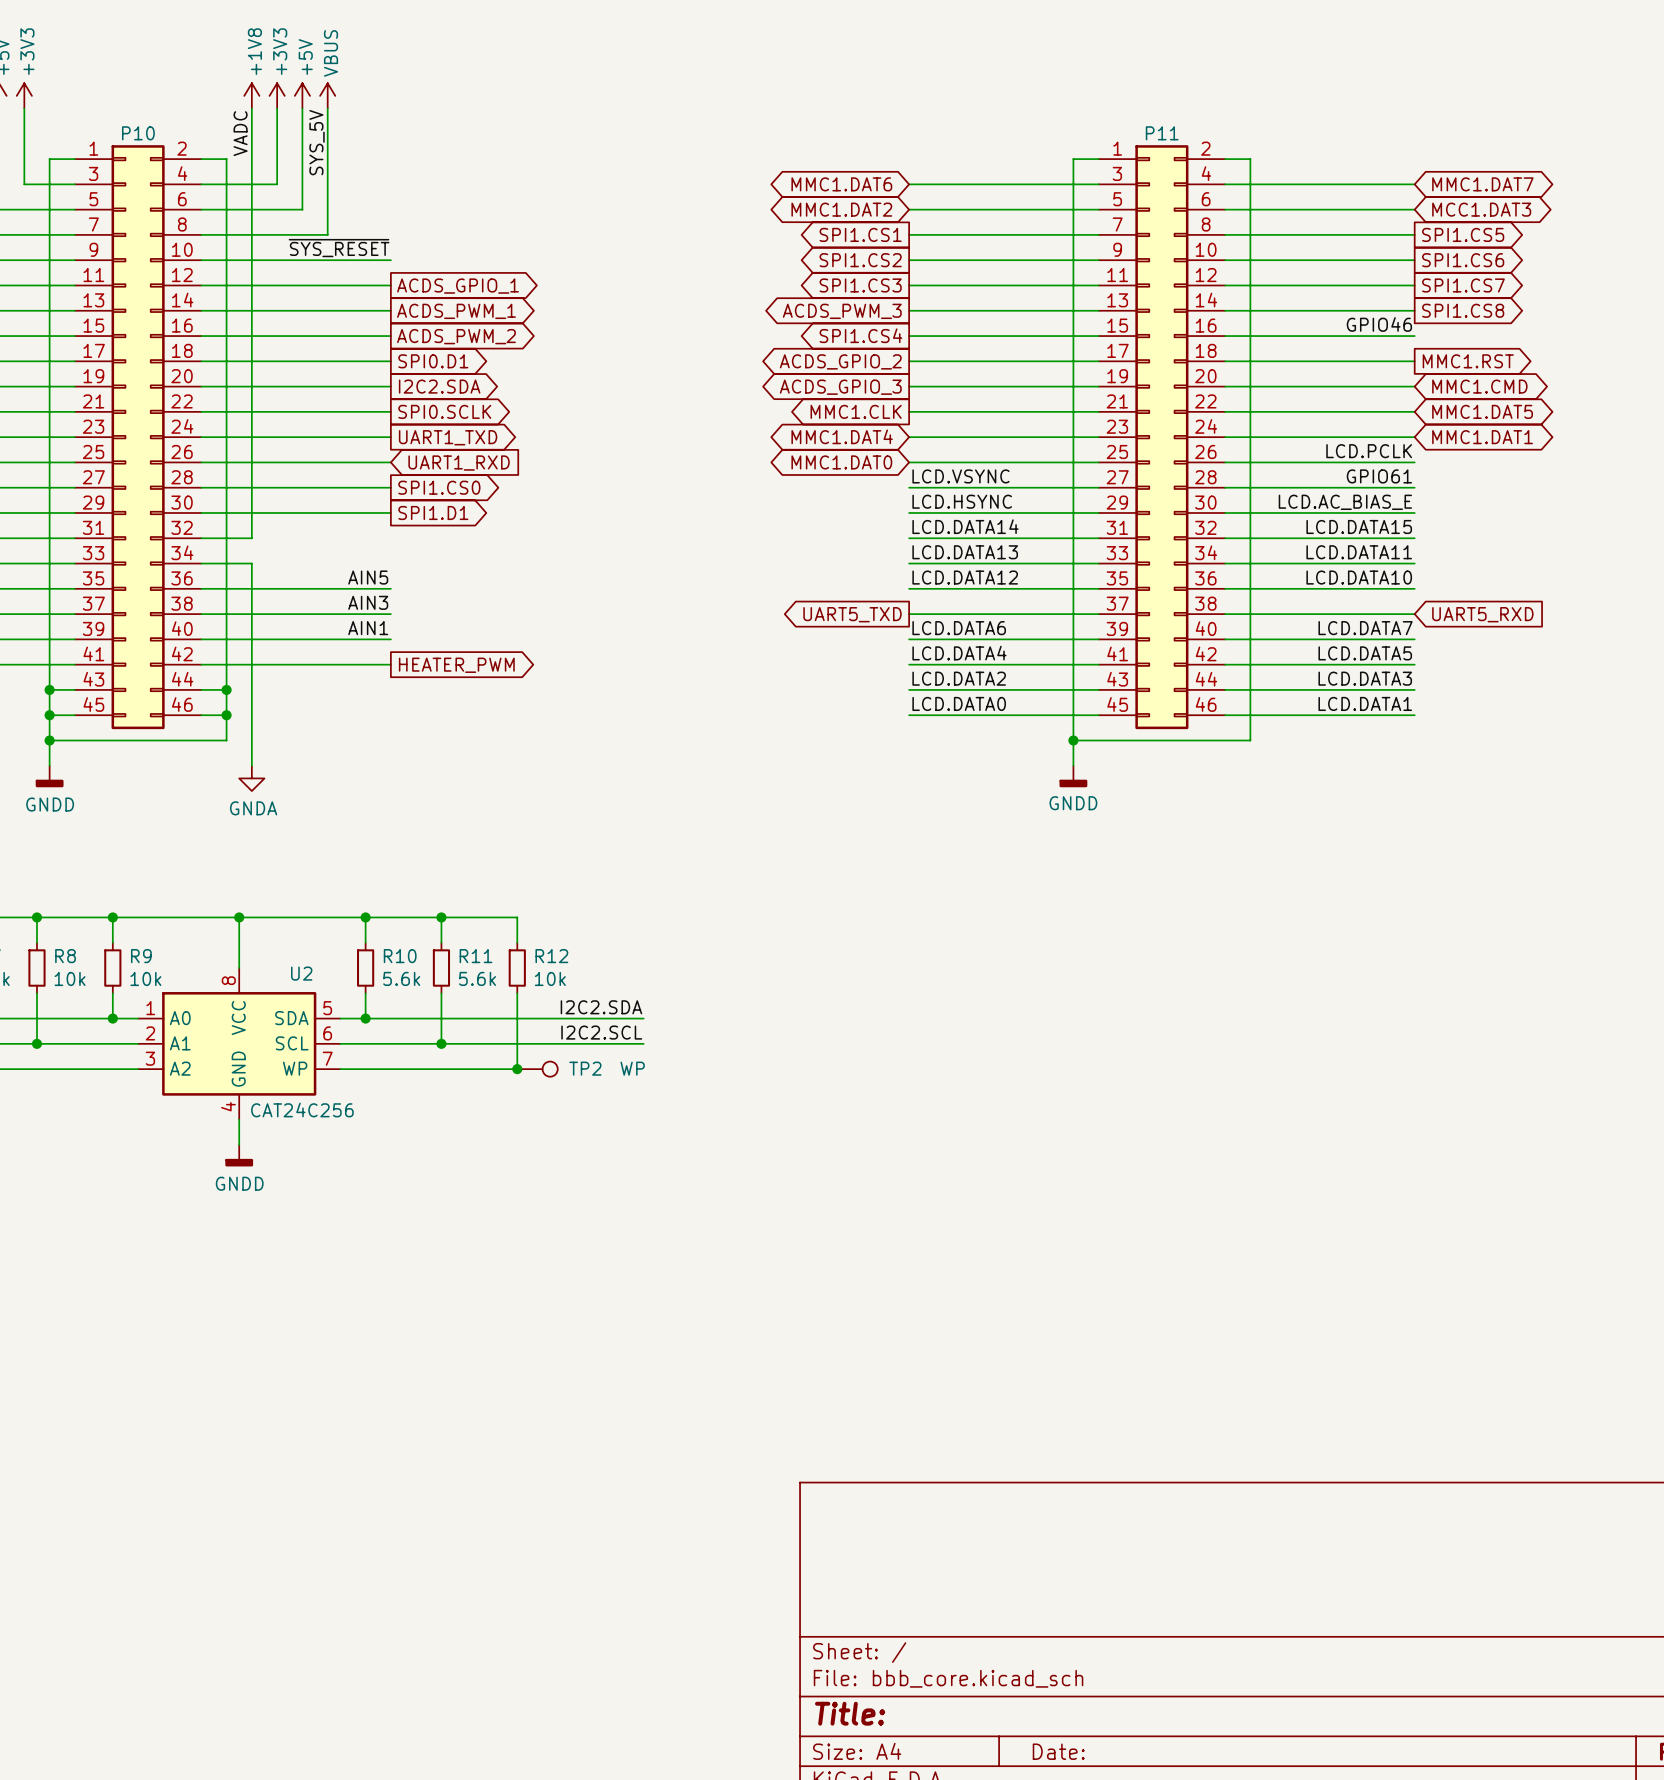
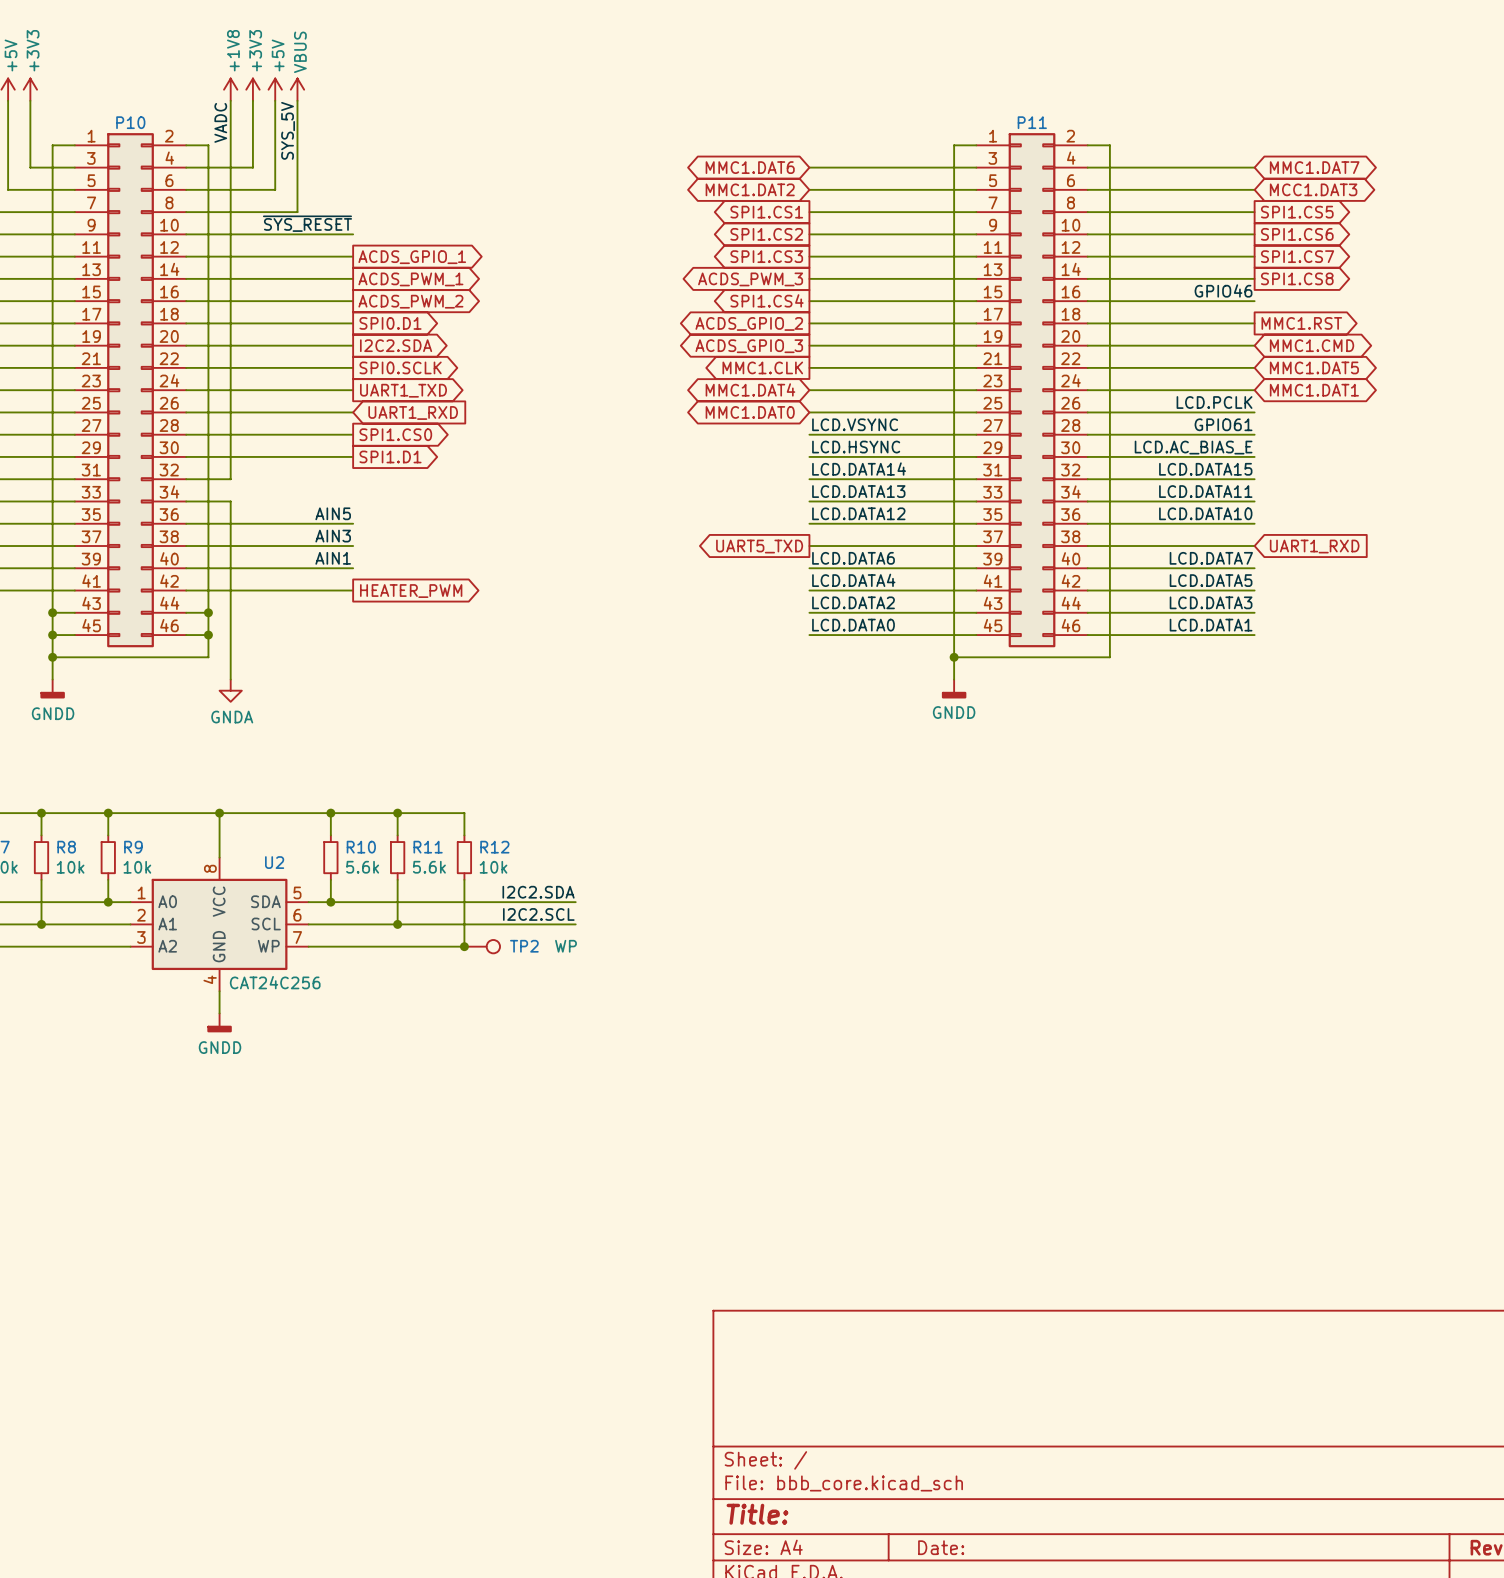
global label: UART5_RXD (1482, 614) -> UART1_RXD (1314, 546)

